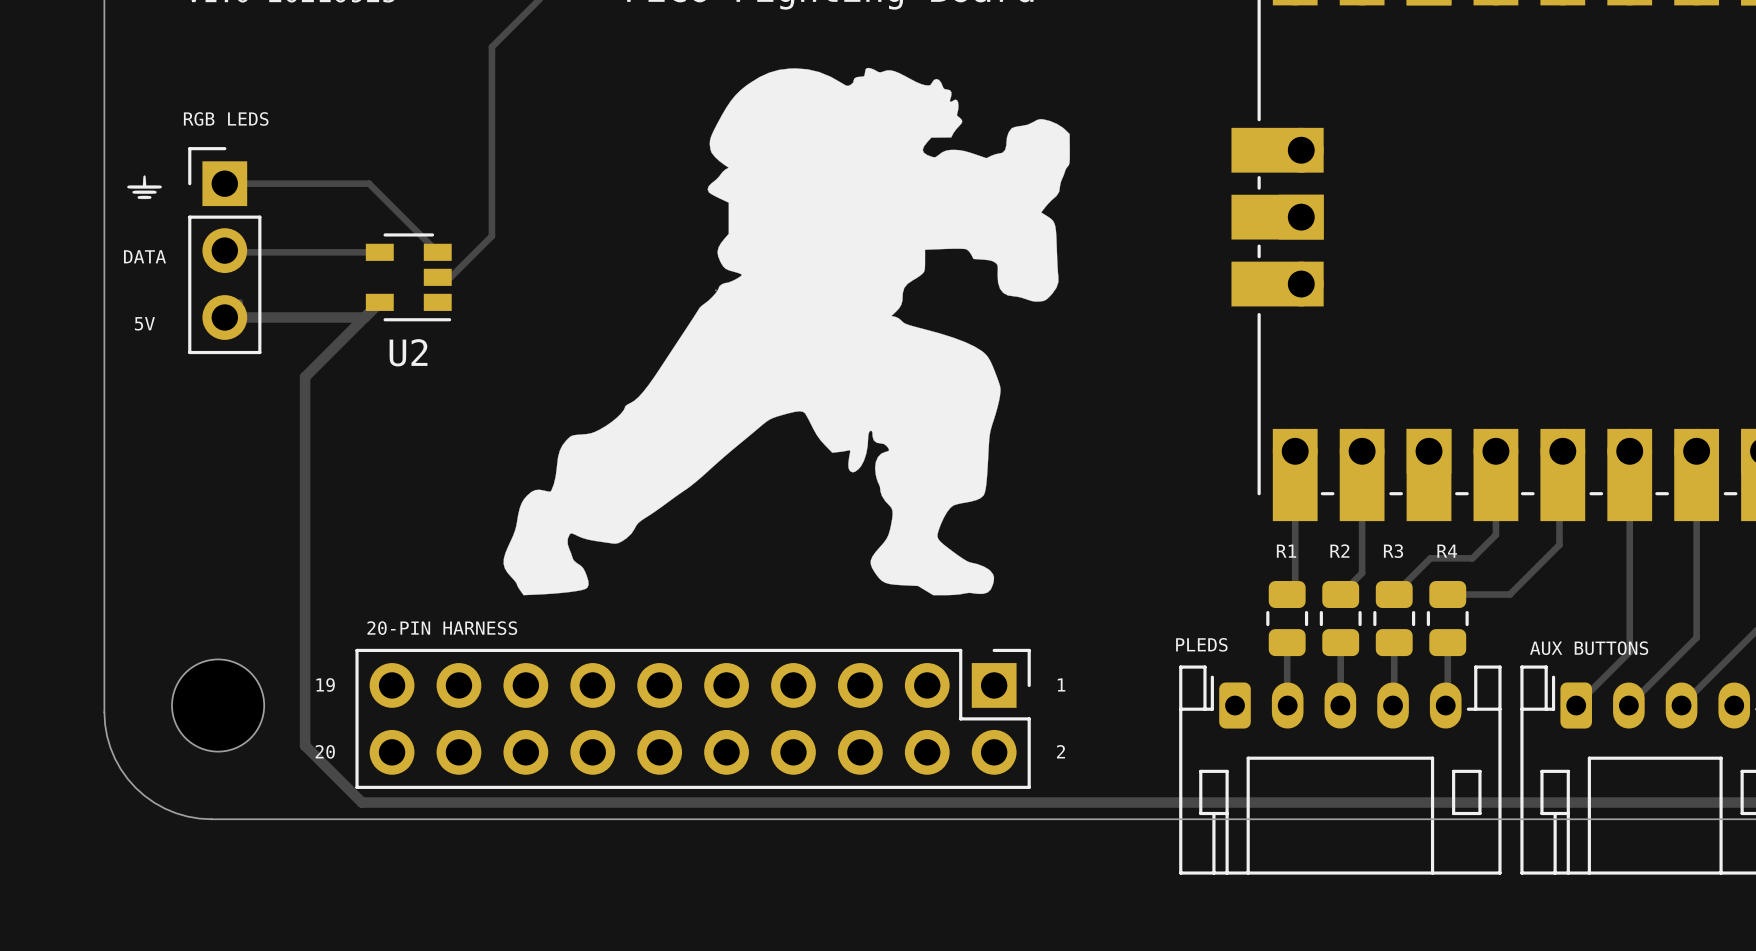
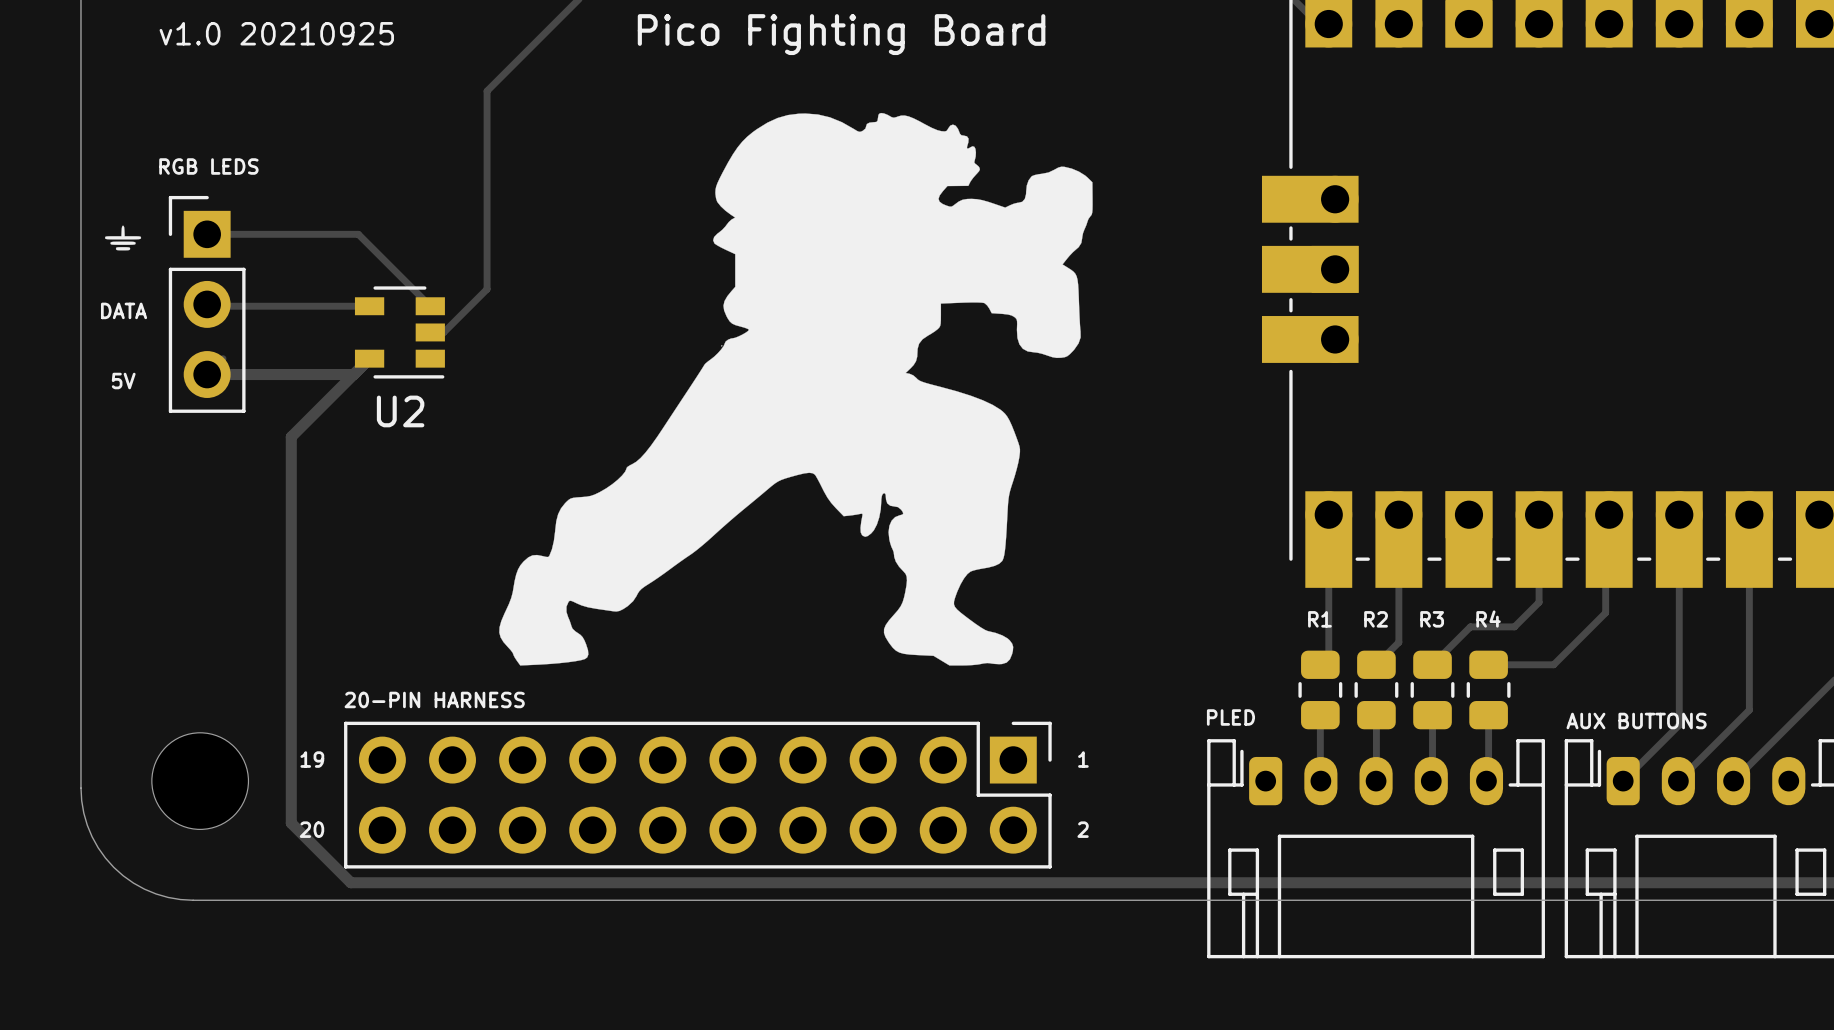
PLEDS name: PLEDS (1201, 644) -> PLED (1230, 717)

